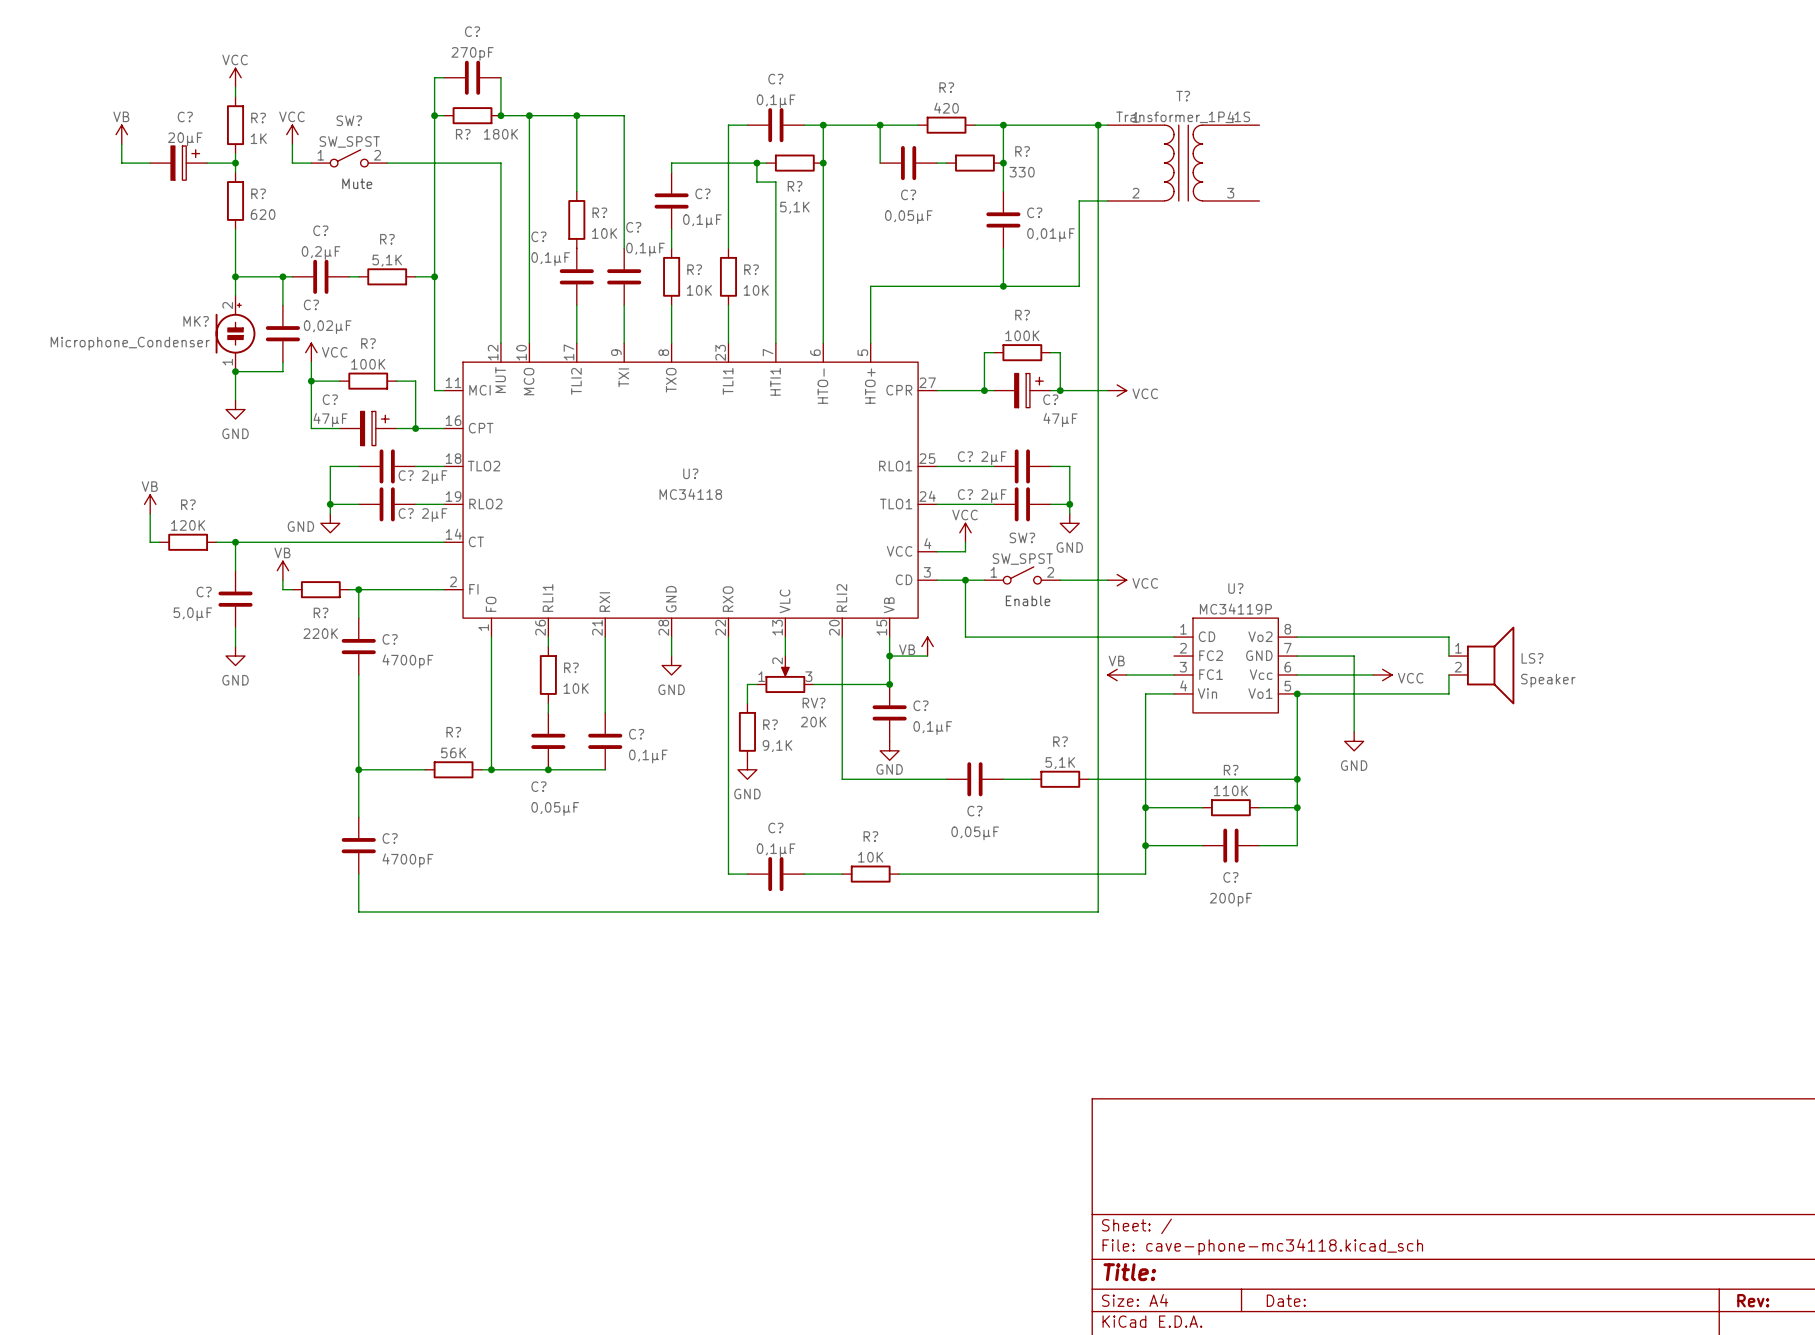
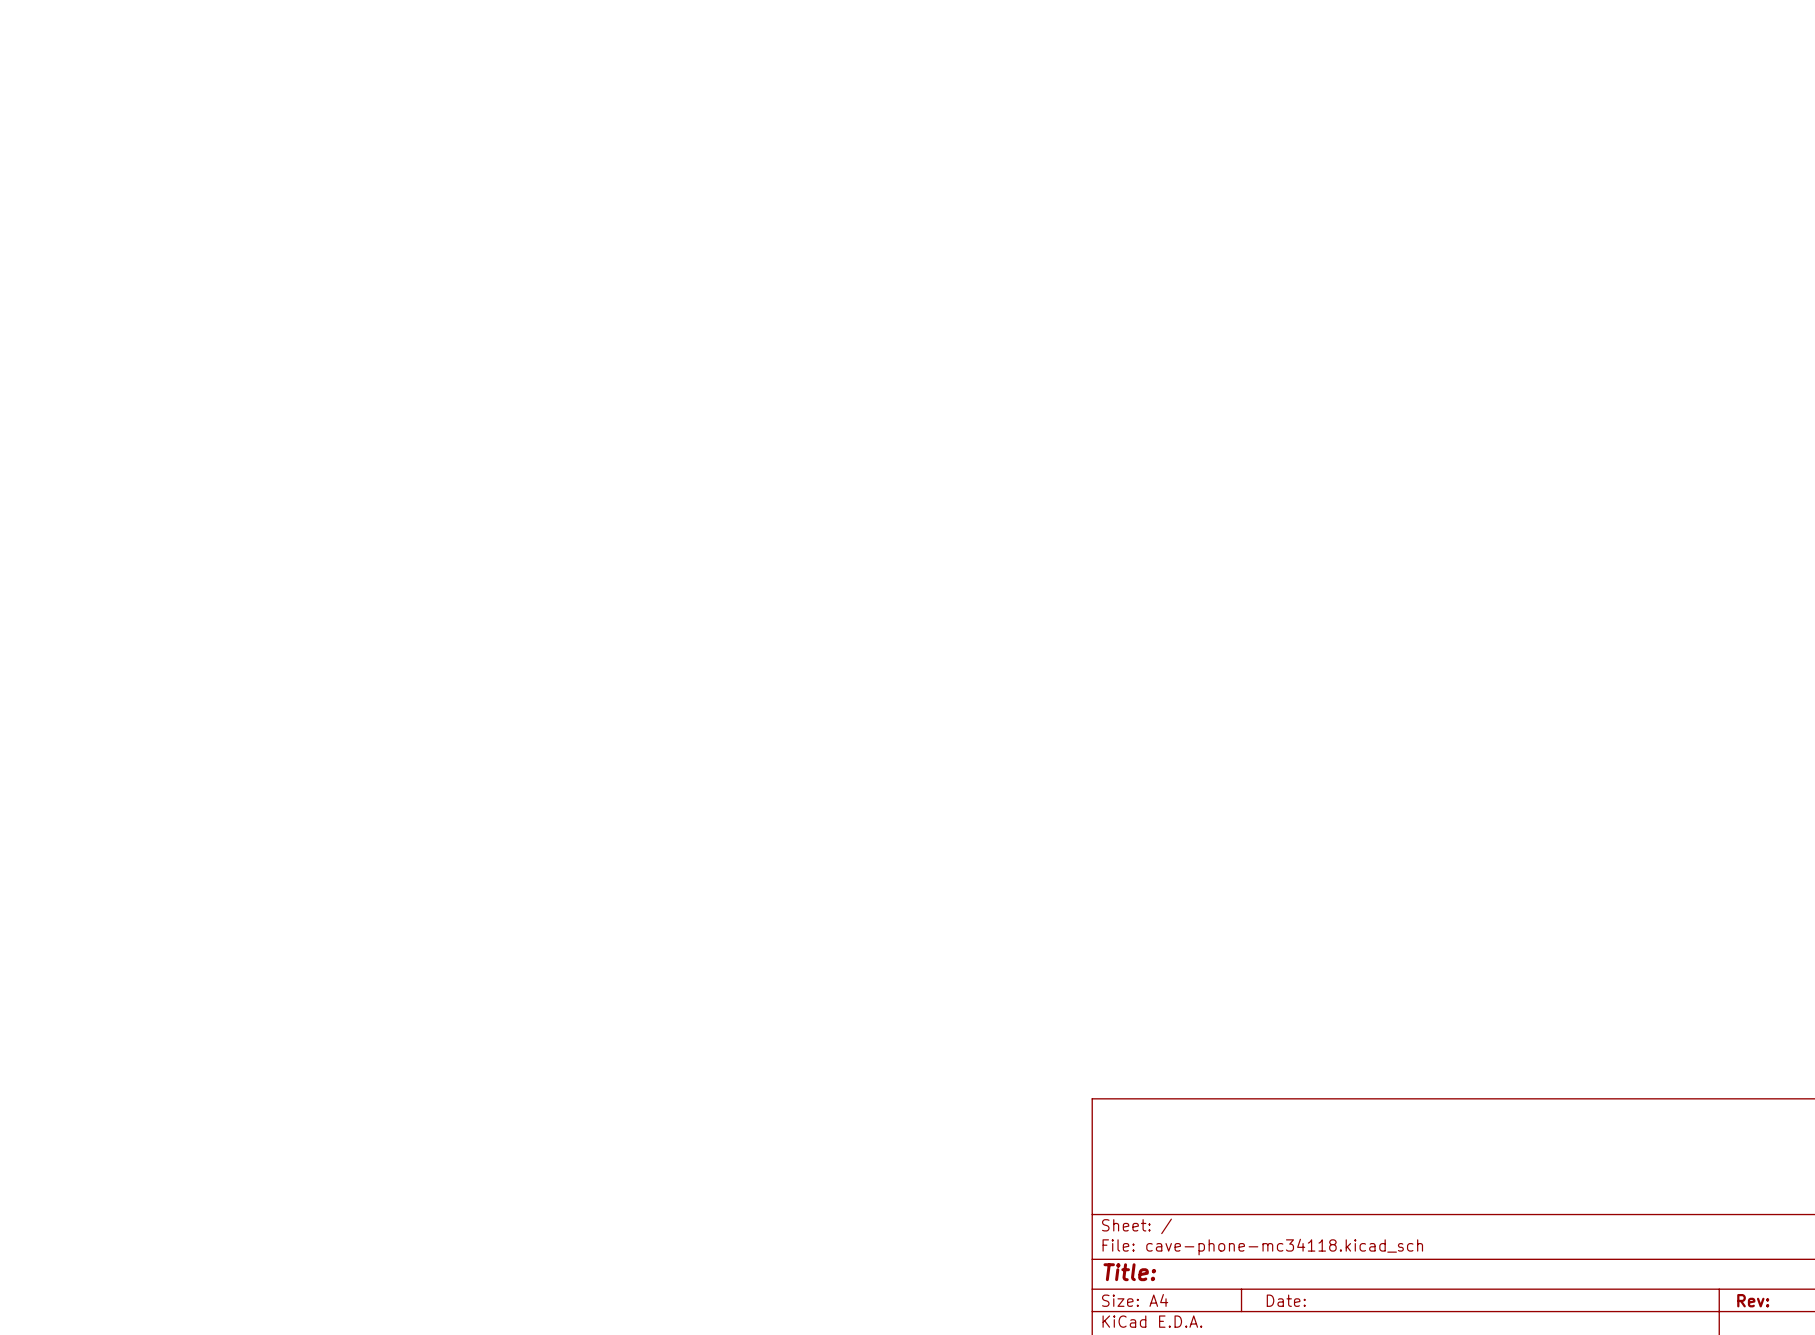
power symbol: VCC (235, 77) -> none
wire: (444, 77) (434, 77) (434, 390) (444, 390) -> none
C?: 270pF (472, 77) -> none
wire: (500, 77) (500, 115) (624, 115) (624, 248) -> none
wire: (235, 87) (235, 96) -> none
wire: (434, 115) (444, 115) -> none
junction: (434, 115) -> none
R?: 180K (472, 115) -> none
junction: (500, 115) -> none
wire: (529, 115) (529, 343) -> none
junction: (529, 115) -> none
wire: (576, 115) (576, 191) -> none
junction: (576, 115) -> none
R?: 1K (235, 125) -> none
wire: (747, 125) (728, 125) (728, 248) -> none
C?: 0,1µF (775, 125) -> none
wire: (804, 125) (918, 125) -> none
wire: (823, 125) (823, 343) -> none
junction: (823, 125) -> none
wire: (880, 125) (880, 163) -> none
junction: (880, 125) -> none
R?: 420 (946, 125) -> none
wire: (974, 125) (1107, 125) -> none
wire: (1003, 125) (1003, 191) -> none
junction: (1003, 125) -> none
wire: (1098, 125) (1098, 911) (358, 911) (358, 874) -> none
junction: (1098, 125) -> none
power symbol: VB (121, 134) -> none
power symbol: VCC (292, 134) -> none
wire: (121, 144) (121, 163) (150, 163) -> none
wire: (292, 144) (292, 163) (311, 163) -> none
wire: (235, 153) (235, 172) -> none
SW?: SW_SPST (349, 158) -> none
C?: 20µF (178, 163) -> none
wire: (207, 163) (235, 163) -> none
junction: (235, 163) -> none
wire: (387, 163) (500, 163) (500, 343) -> none
wire: (756, 163) (756, 182) (775, 182) (775, 343) -> none
junction: (756, 163) -> none
wire: (766, 163) (671, 163) (671, 172) -> none
R?: 5,1K (794, 163) -> none
junction: (823, 163) -> none
C?: 0,05µF (908, 163) -> none
wire: (937, 163) (946, 163) -> none
R?: 330 (974, 163) -> none
junction: (1003, 163) -> none
T?: Transformer_1P_1S (1183, 163) -> none
text: Mute (357, 183) -> none
R?: 620 (235, 200) -> none
C?: 0,1µF (671, 200) -> none
wire: (1107, 200) (1079, 200) (1079, 286) (870, 286) (870, 343) -> none
R?: 10K (576, 219) -> none
C?: 0,01µF (1003, 219) -> none
wire: (235, 229) (235, 295) -> none
wire: (671, 229) (671, 248) -> none
wire: (1003, 248) (1003, 286) -> none
wire: (235, 276) (292, 276) -> none
junction: (235, 276) -> none
wire: (282, 276) (282, 305) -> none
junction: (282, 276) -> none
C?: 0,2µF (320, 276) -> none
wire: (349, 276) (358, 276) -> none
R?: 5,1K (387, 276) -> none
wire: (415, 276) (434, 276) -> none
junction: (434, 276) -> none
C?: 0,1µF (576, 276) -> none
C?: 0,1µF (624, 276) -> none
R?: 10K (671, 276) -> none
R?: 10K (728, 276) -> none
junction: (1003, 286) -> none
wire: (576, 305) (576, 343) -> none
wire: (624, 305) (624, 343) -> none
wire: (671, 305) (671, 343) -> none
wire: (728, 305) (728, 343) -> none
MK?: Microphone_Condenser (235, 333) -> none
C?: 0,02µF (282, 333) -> none
power symbol: VCC (311, 352) -> none
wire: (993, 352) (984, 352) (984, 390) -> none
R?: 100K (1022, 352) -> none
wire: (1050, 352) (1060, 352) (1060, 390) -> none
wire: (282, 362) (282, 371) (235, 371) (235, 400) -> none
wire: (311, 362) (311, 428) (339, 428) -> none
junction: (235, 371) -> none
wire: (311, 381) (339, 381) -> none
junction: (311, 381) -> none
R?: 100K (368, 381) -> none
wire: (396, 381) (415, 381) (415, 428) -> none
wire: (937, 390) (993, 390) -> none
junction: (984, 390) -> none
C?: 47µF (1022, 390) -> none
wire: (1050, 390) (1107, 390) -> none
junction: (1060, 390) -> none
power symbol: VCC (1117, 390) -> none
power symbol: GND (235, 409) -> none
C?: 47µF (368, 428) -> none
wire: (396, 428) (444, 428) -> none
junction: (415, 428) -> none
wire: (358, 466) (330, 466) (330, 513) -> none
C?: 2µF (387, 466) -> none
wire: (415, 466) (444, 466) -> none
wire: (937, 466) (993, 466) -> none
C?: 2µF (1022, 466) -> none
wire: (1050, 466) (1069, 466) (1069, 513) -> none
U?: MC34118 (690, 490) -> none
power symbol: VB (150, 504) -> none
wire: (330, 504) (358, 504) -> none
junction: (330, 504) -> none
C?: 2µF (387, 504) -> none
wire: (415, 504) (444, 504) -> none
wire: (937, 504) (993, 504) -> none
C?: 2µF (1022, 504) -> none
wire: (1050, 504) (1069, 504) -> none
junction: (1069, 504) -> none
wire: (150, 513) (150, 542) (159, 542) -> none
power symbol: GND (330, 523) -> none
power symbol: GND (1069, 523) -> none
power symbol: VCC (965, 532) -> none
R?: 120K (188, 542) -> none
wire: (216, 542) (444, 542) -> none
wire: (235, 542) (235, 570) -> none
junction: (235, 542) -> none
wire: (965, 542) (965, 551) (937, 551) -> none
power symbol: VB (282, 570) -> none
SW?: SW_SPST (1022, 575) -> none
wire: (282, 580) (282, 589) (292, 589) -> none
wire: (937, 580) (984, 580) -> none
wire: (965, 580) (965, 637) (1174, 637) -> none
junction: (965, 580) -> none
wire: (1060, 580) (1107, 580) -> none
power symbol: VCC (1117, 580) -> none
R?: 220K (320, 589) -> none
wire: (349, 589) (444, 589) -> none
wire: (358, 589) (358, 618) -> none
junction: (358, 589) -> none
C?: 5,0µF (235, 599) -> none
text: Enable (1028, 600) -> none
wire: (235, 627) (235, 646) -> none
wire: (491, 637) (491, 769) -> none
wire: (548, 637) (548, 646) -> none
wire: (605, 637) (605, 712) -> none
wire: (671, 637) (671, 656) -> none
wire: (728, 637) (728, 874) (747, 874) -> none
wire: (785, 637) (785, 656) -> none
wire: (842, 637) (842, 779) (946, 779) -> none
wire: (889, 637) (889, 684) (813, 684) -> none
wire: (1297, 637) (1448, 637) (1448, 656) -> none
C?: 4700pF (358, 646) -> none
power symbol: VB (927, 646) -> none
power symbol: GND (235, 656) -> none
wire: (889, 656) (927, 656) -> none
junction: (889, 656) -> none
wire: (1297, 656) (1354, 656) (1354, 731) -> none
power symbol: GND (671, 665) -> none
U?: MC34119P (1235, 665) -> none
LS?: Speaker (1481, 665) -> none
wire: (358, 674) (358, 817) -> none
R?: 10K (548, 674) -> none
RV?: 20K (785, 674) -> none
power symbol: VB (1117, 674) -> none
wire: (1126, 674) (1174, 674) -> none
wire: (1297, 674) (1373, 674) -> none
power symbol: VCC (1382, 674) -> none
wire: (1448, 674) (1448, 693) (1297, 693) (1297, 845) (1259, 845) -> none
wire: (756, 684) (747, 684) (747, 703) -> none
junction: (889, 684) -> none
wire: (1174, 693) (1145, 693) (1145, 874) (899, 874) -> none
junction: (1297, 693) -> none
wire: (548, 703) (548, 712) -> none
C?: 0,1µF (889, 712) -> none
R?: 9,1K (747, 731) -> none
C?: 0,05µF (548, 741) -> none
C?: 0,1µF (605, 741) -> none
power symbol: GND (1354, 741) -> none
power symbol: GND (889, 750) -> none
wire: (358, 769) (425, 769) -> none
junction: (358, 769) -> none
R?: 56K (453, 769) -> none
wire: (482, 769) (605, 769) -> none
junction: (491, 769) -> none
junction: (548, 769) -> none
power symbol: GND (747, 769) -> none
C?: 0,05µF (974, 779) -> none
wire: (1003, 779) (1031, 779) -> none
R?: 5,1K (1060, 779) -> none
wire: (1088, 779) (1297, 779) -> none
junction: (1297, 779) -> none
wire: (1145, 807) (1202, 807) -> none
junction: (1145, 807) -> none
R?: 110K (1230, 807) -> none
wire: (1259, 807) (1297, 807) -> none
junction: (1297, 807) -> none
C?: 4700pF (358, 845) -> none
wire: (1145, 845) (1202, 845) -> none
junction: (1145, 845) -> none
C?: 200pF (1230, 845) -> none
C?: 0,1µF (775, 874) -> none
wire: (804, 874) (842, 874) -> none
R?: 10K (870, 874) -> none

